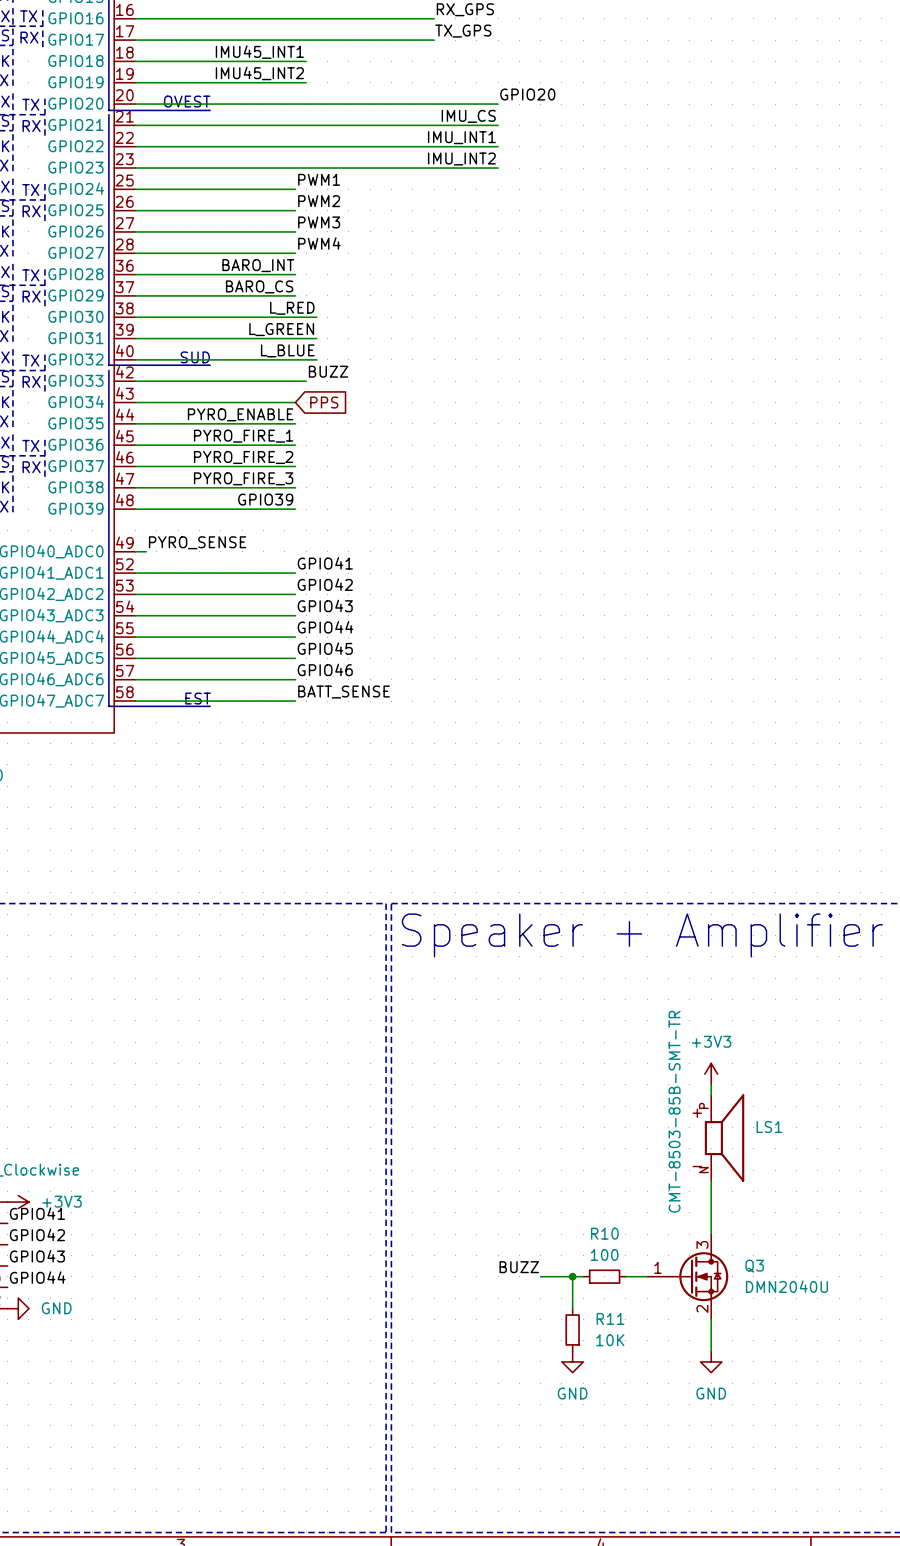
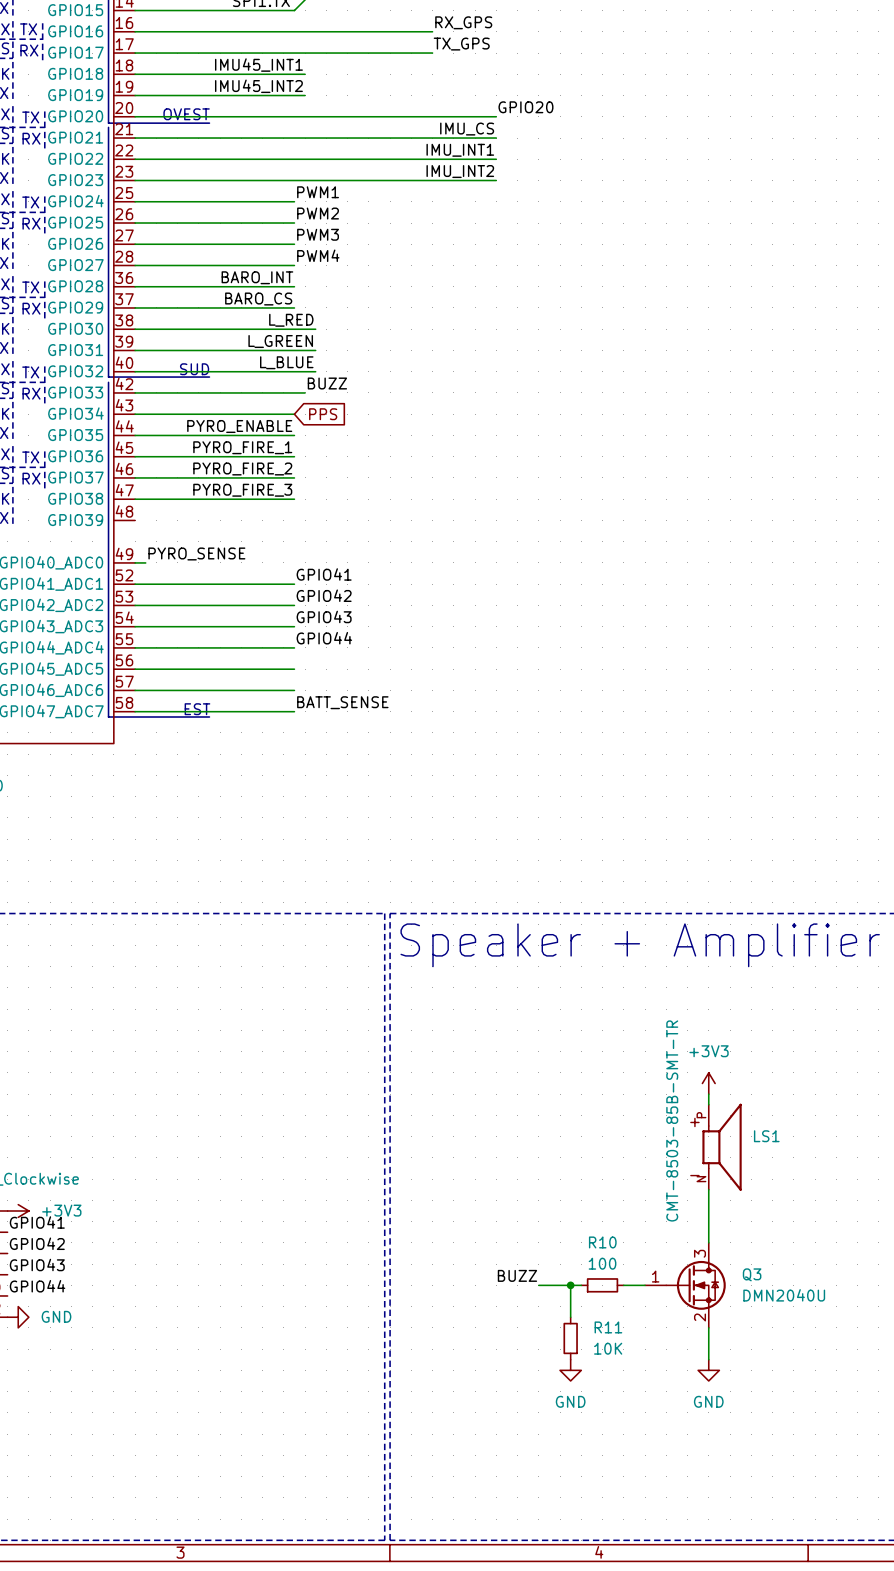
label: GPIO39 (265, 499) -> none
wire: (135, 509) (295, 509) -> none
label: GPIO45 (325, 648) -> none
label: GPIO46 (325, 669) -> none

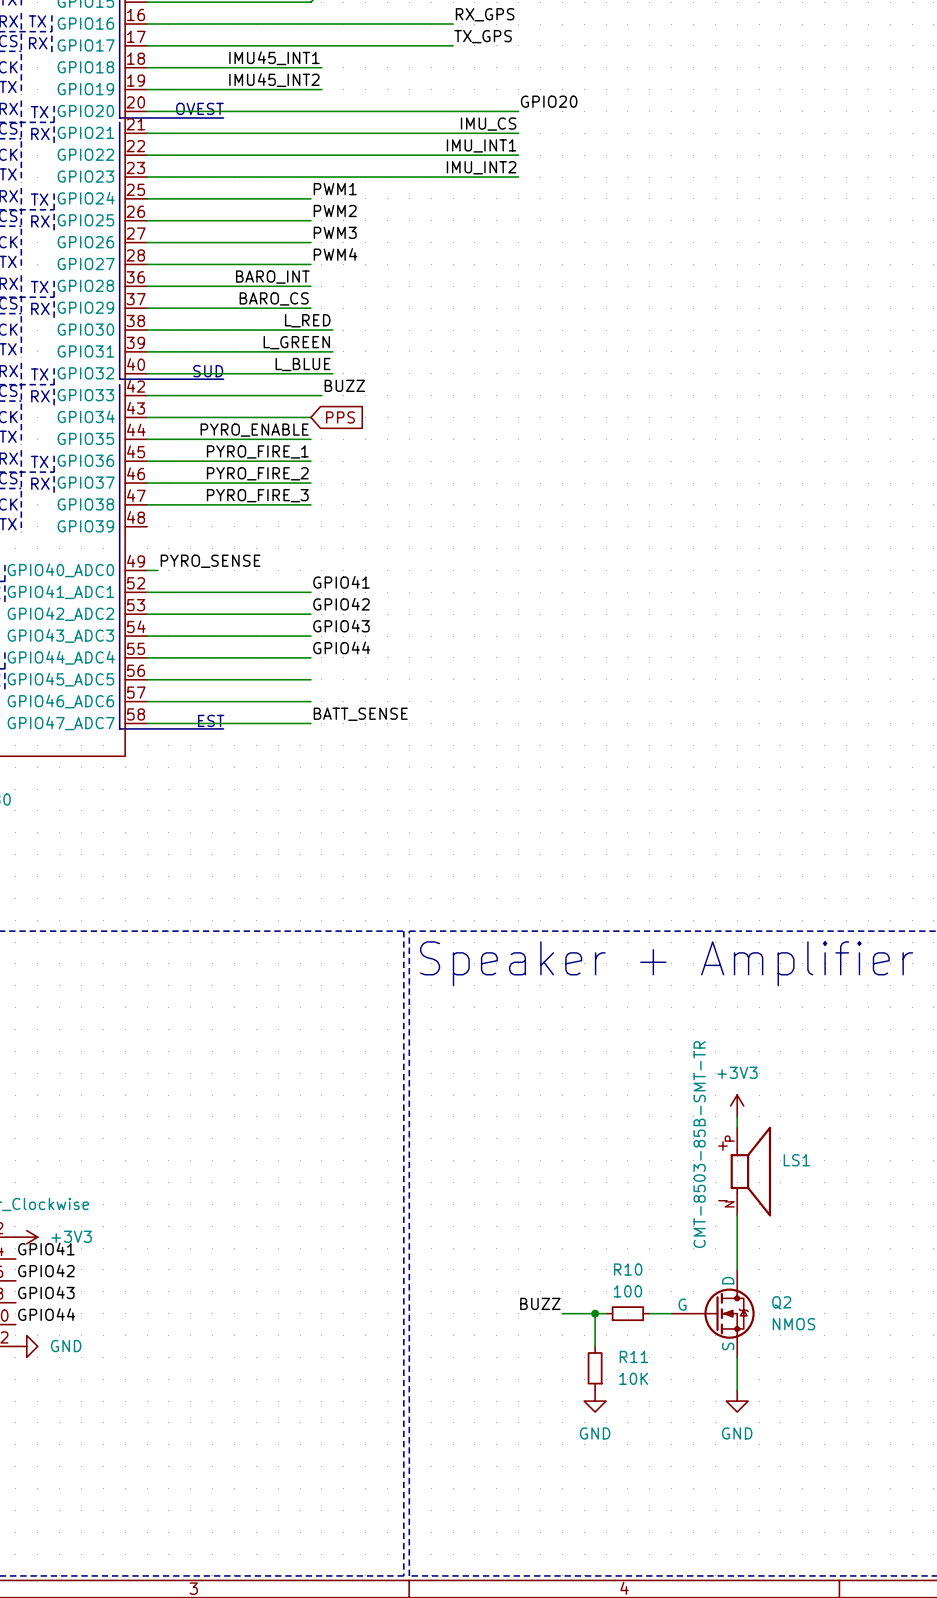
Q3: DMN2040U (685, 1285) -> none
Q2: none -> NMOS (713, 1313)

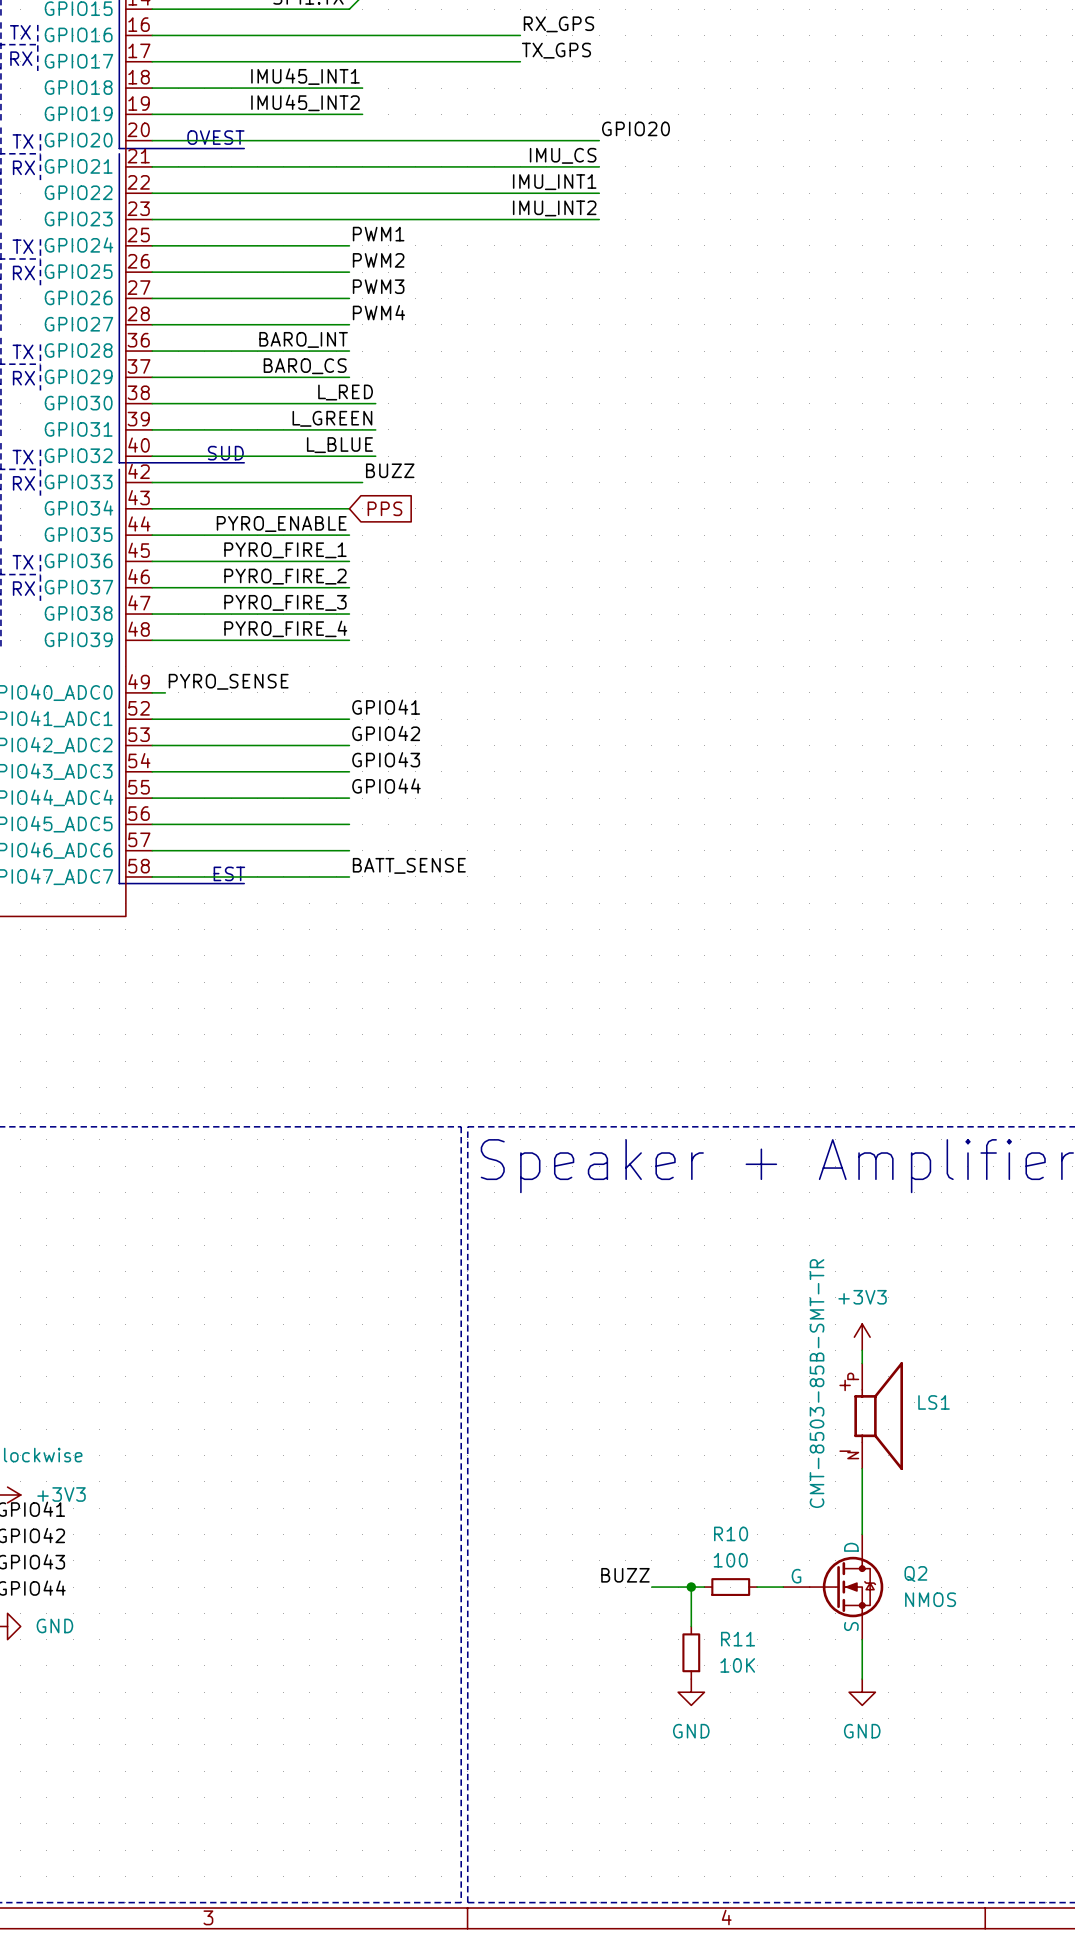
label: none -> PYRO_FIRE_4 (285, 628)
wire: none -> (152, 640) (349, 640)

